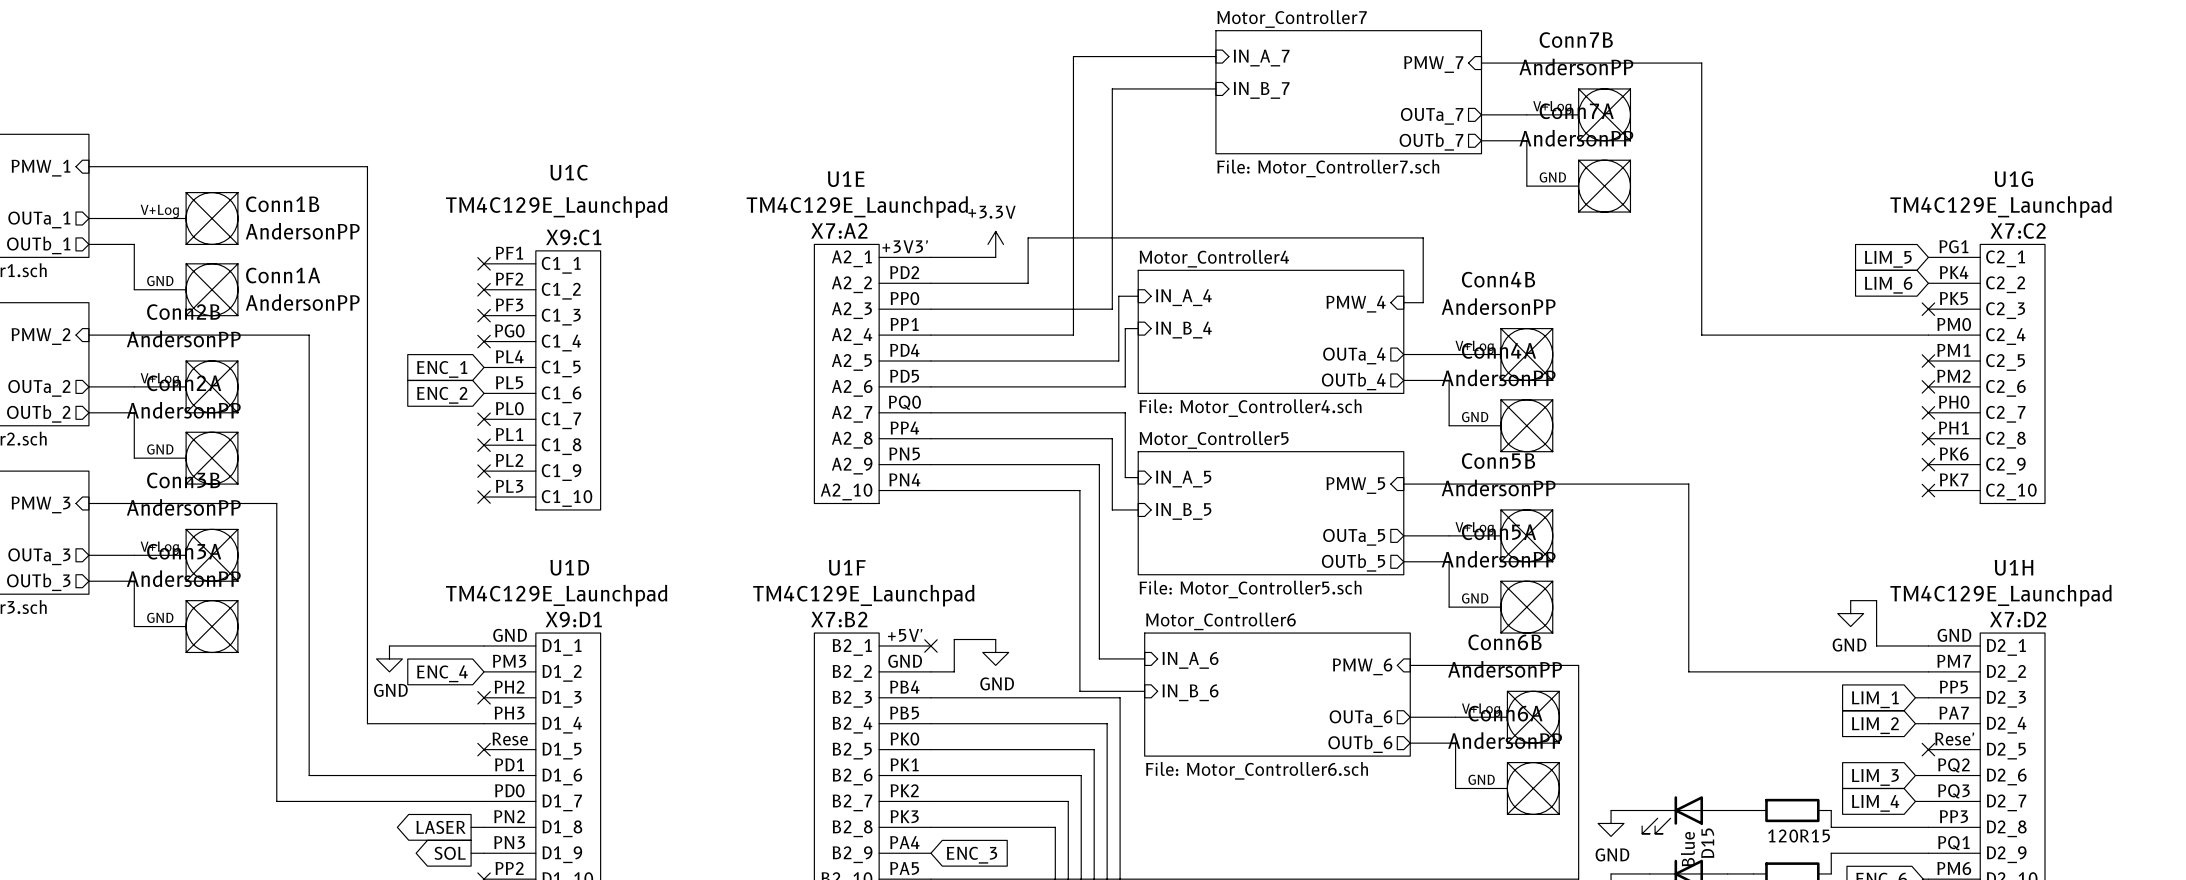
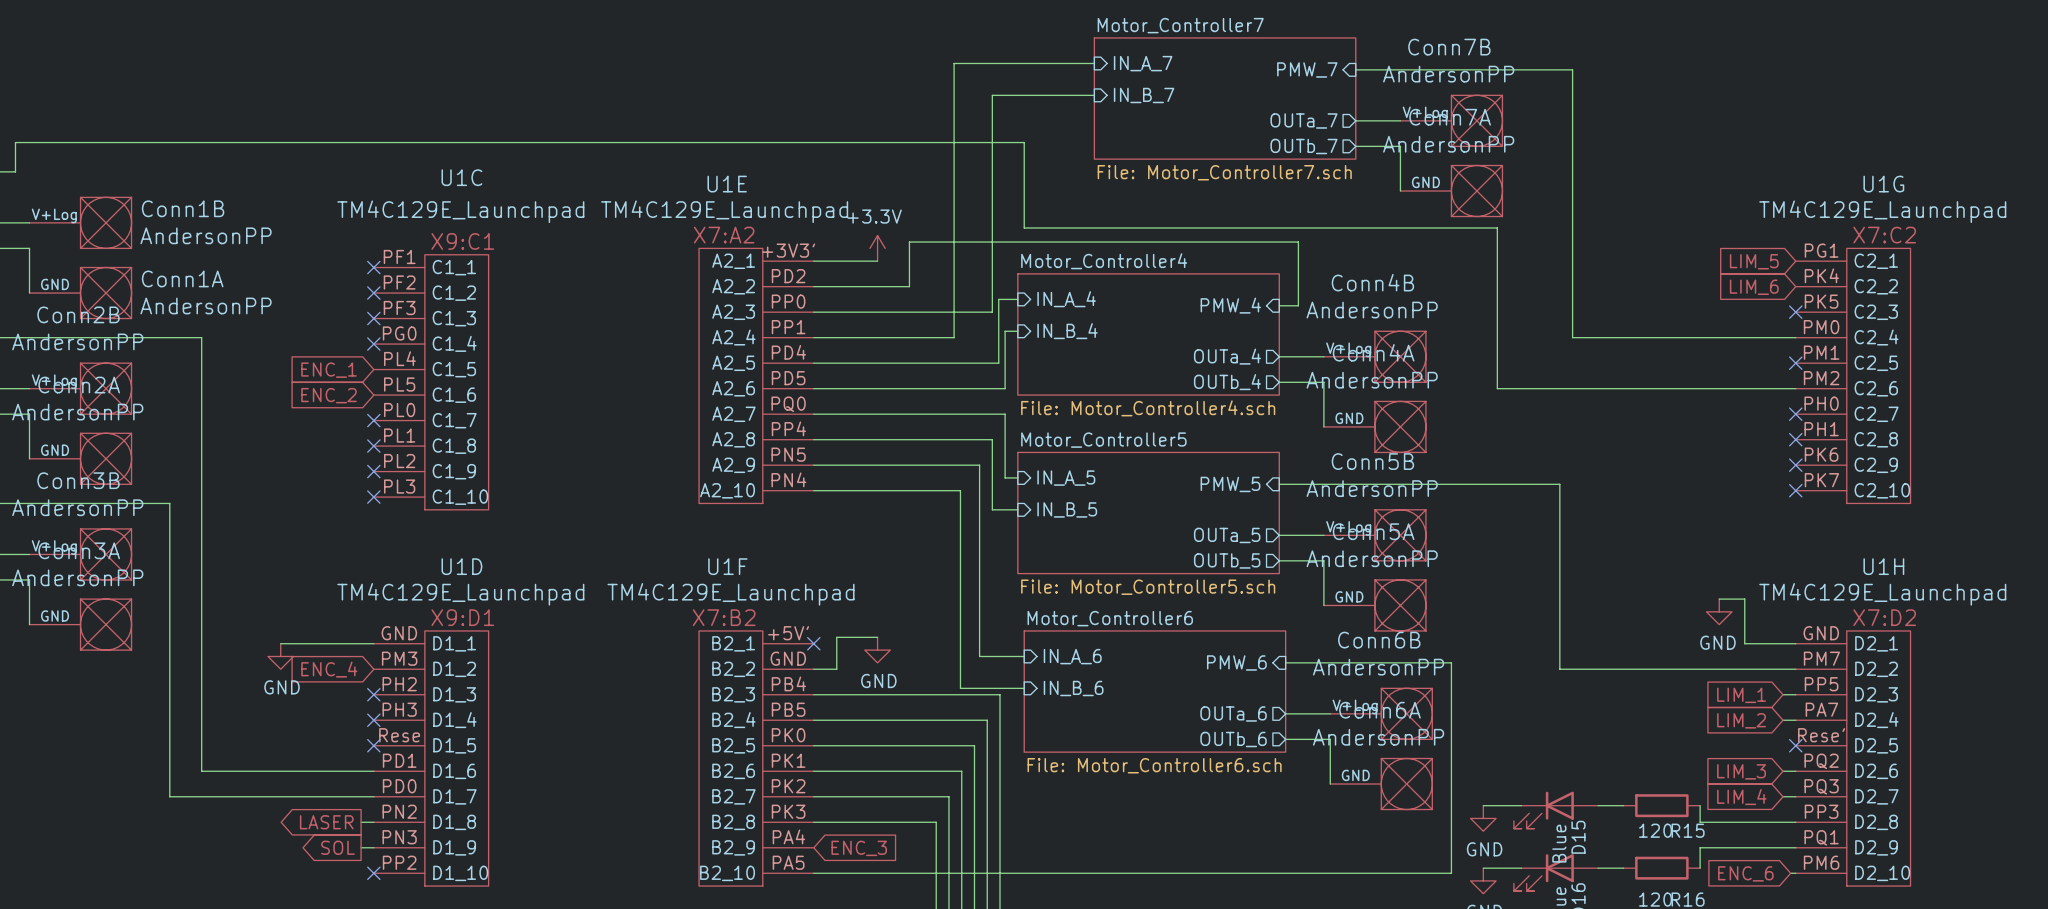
wire: (120, 166) (367, 166) (367, 723) (484, 723) -> (15, 171) (15, 142) (1024, 142) (1024, 227) (1497, 227) (1497, 388) (1795, 388)
no-connect mark: (1928, 386) -> none
no-connect mark: none -> (373, 720)

